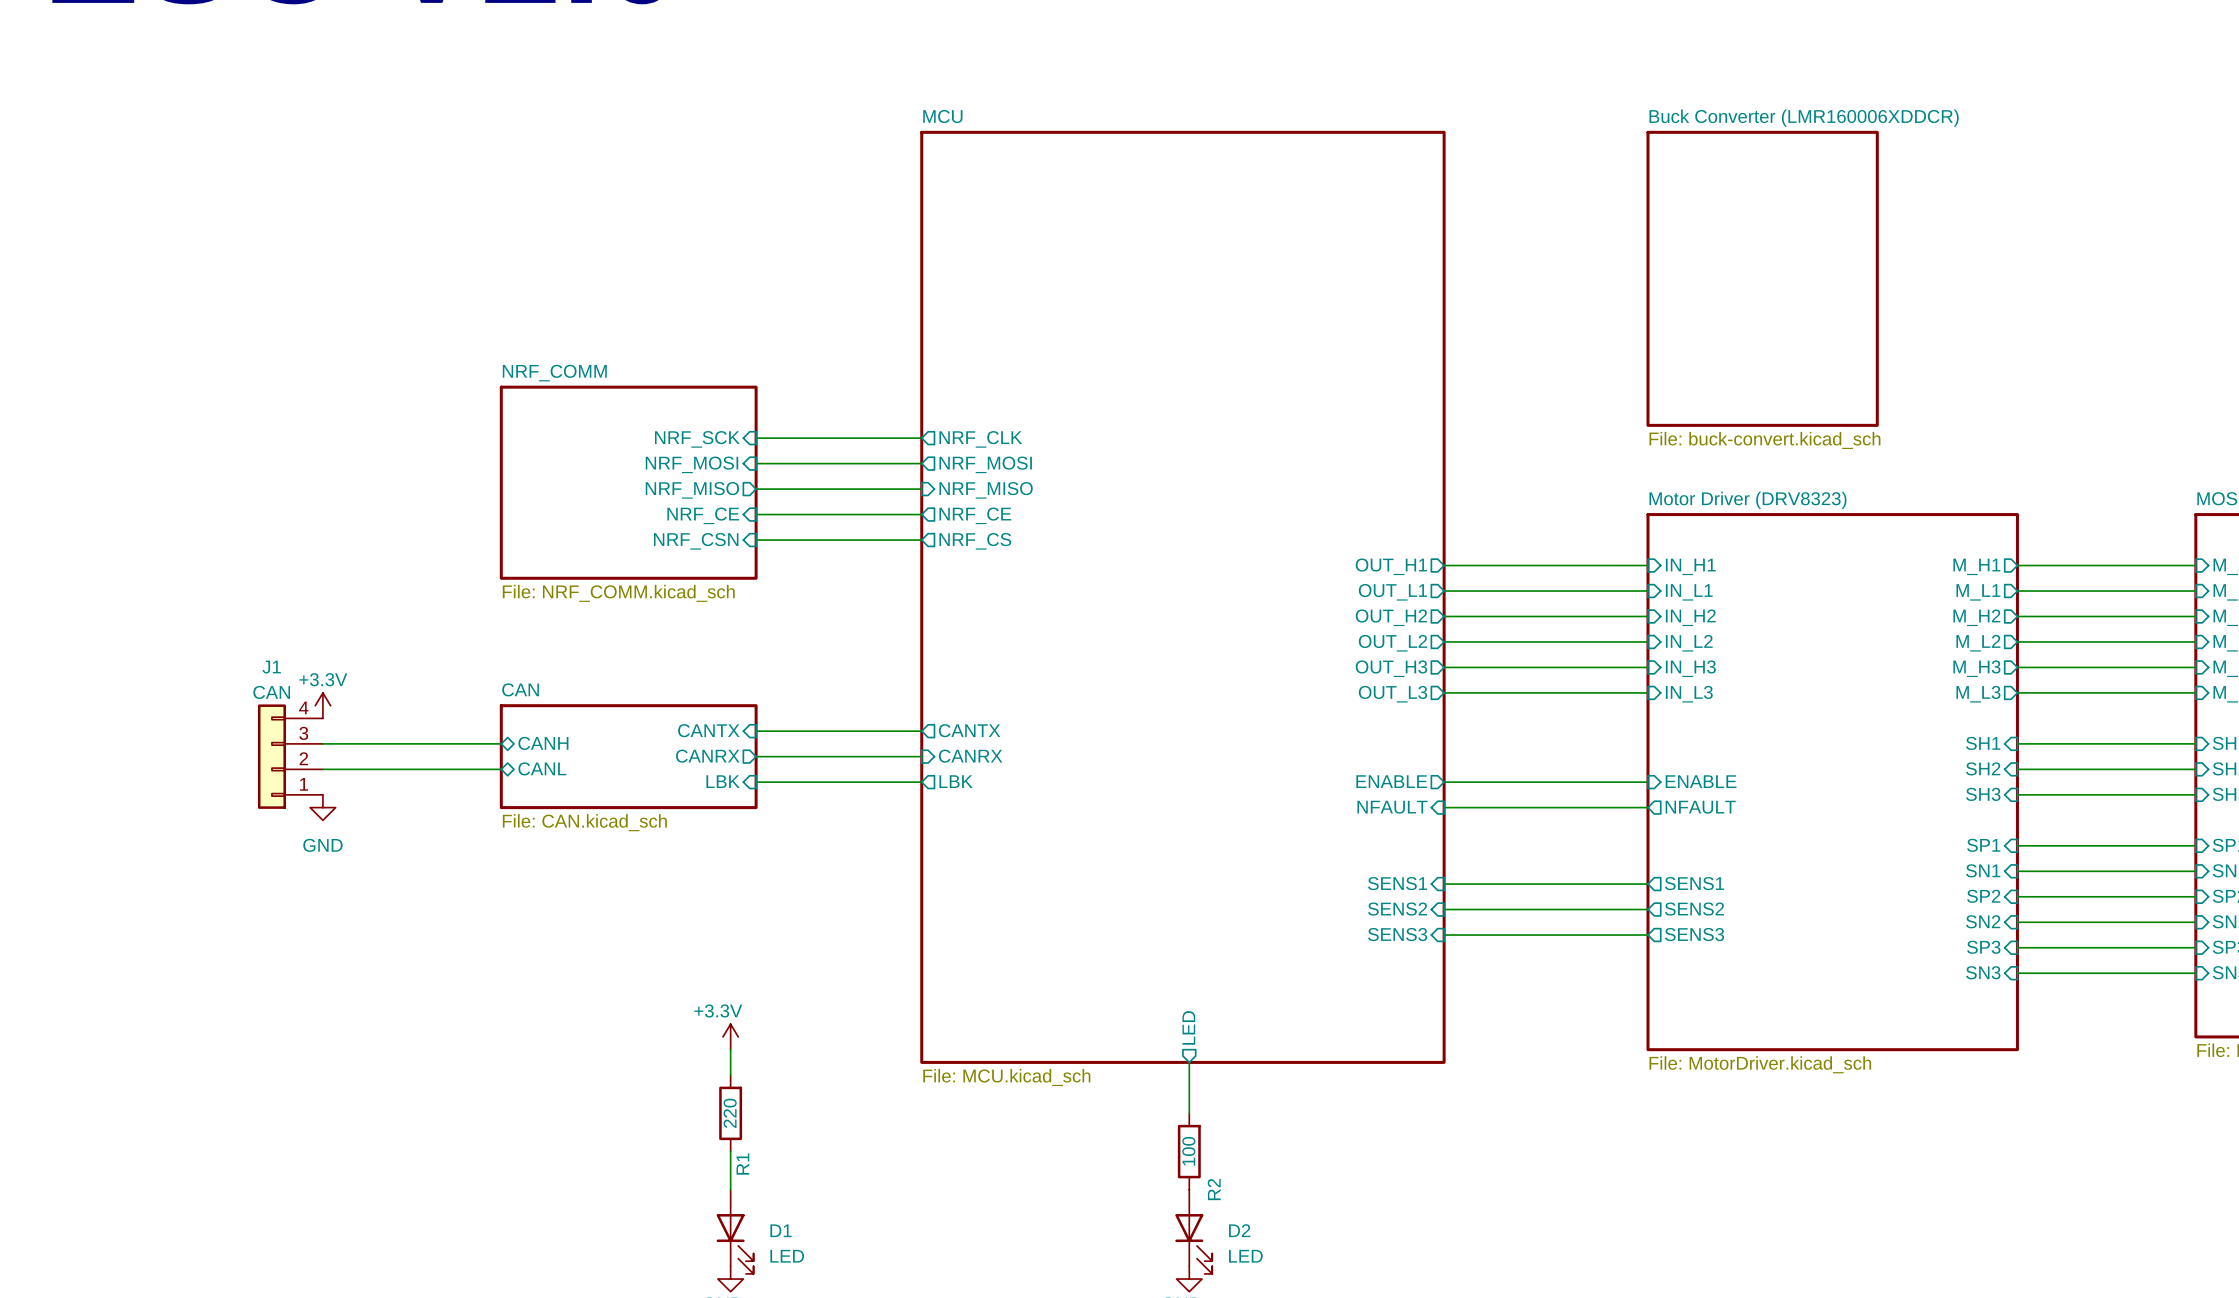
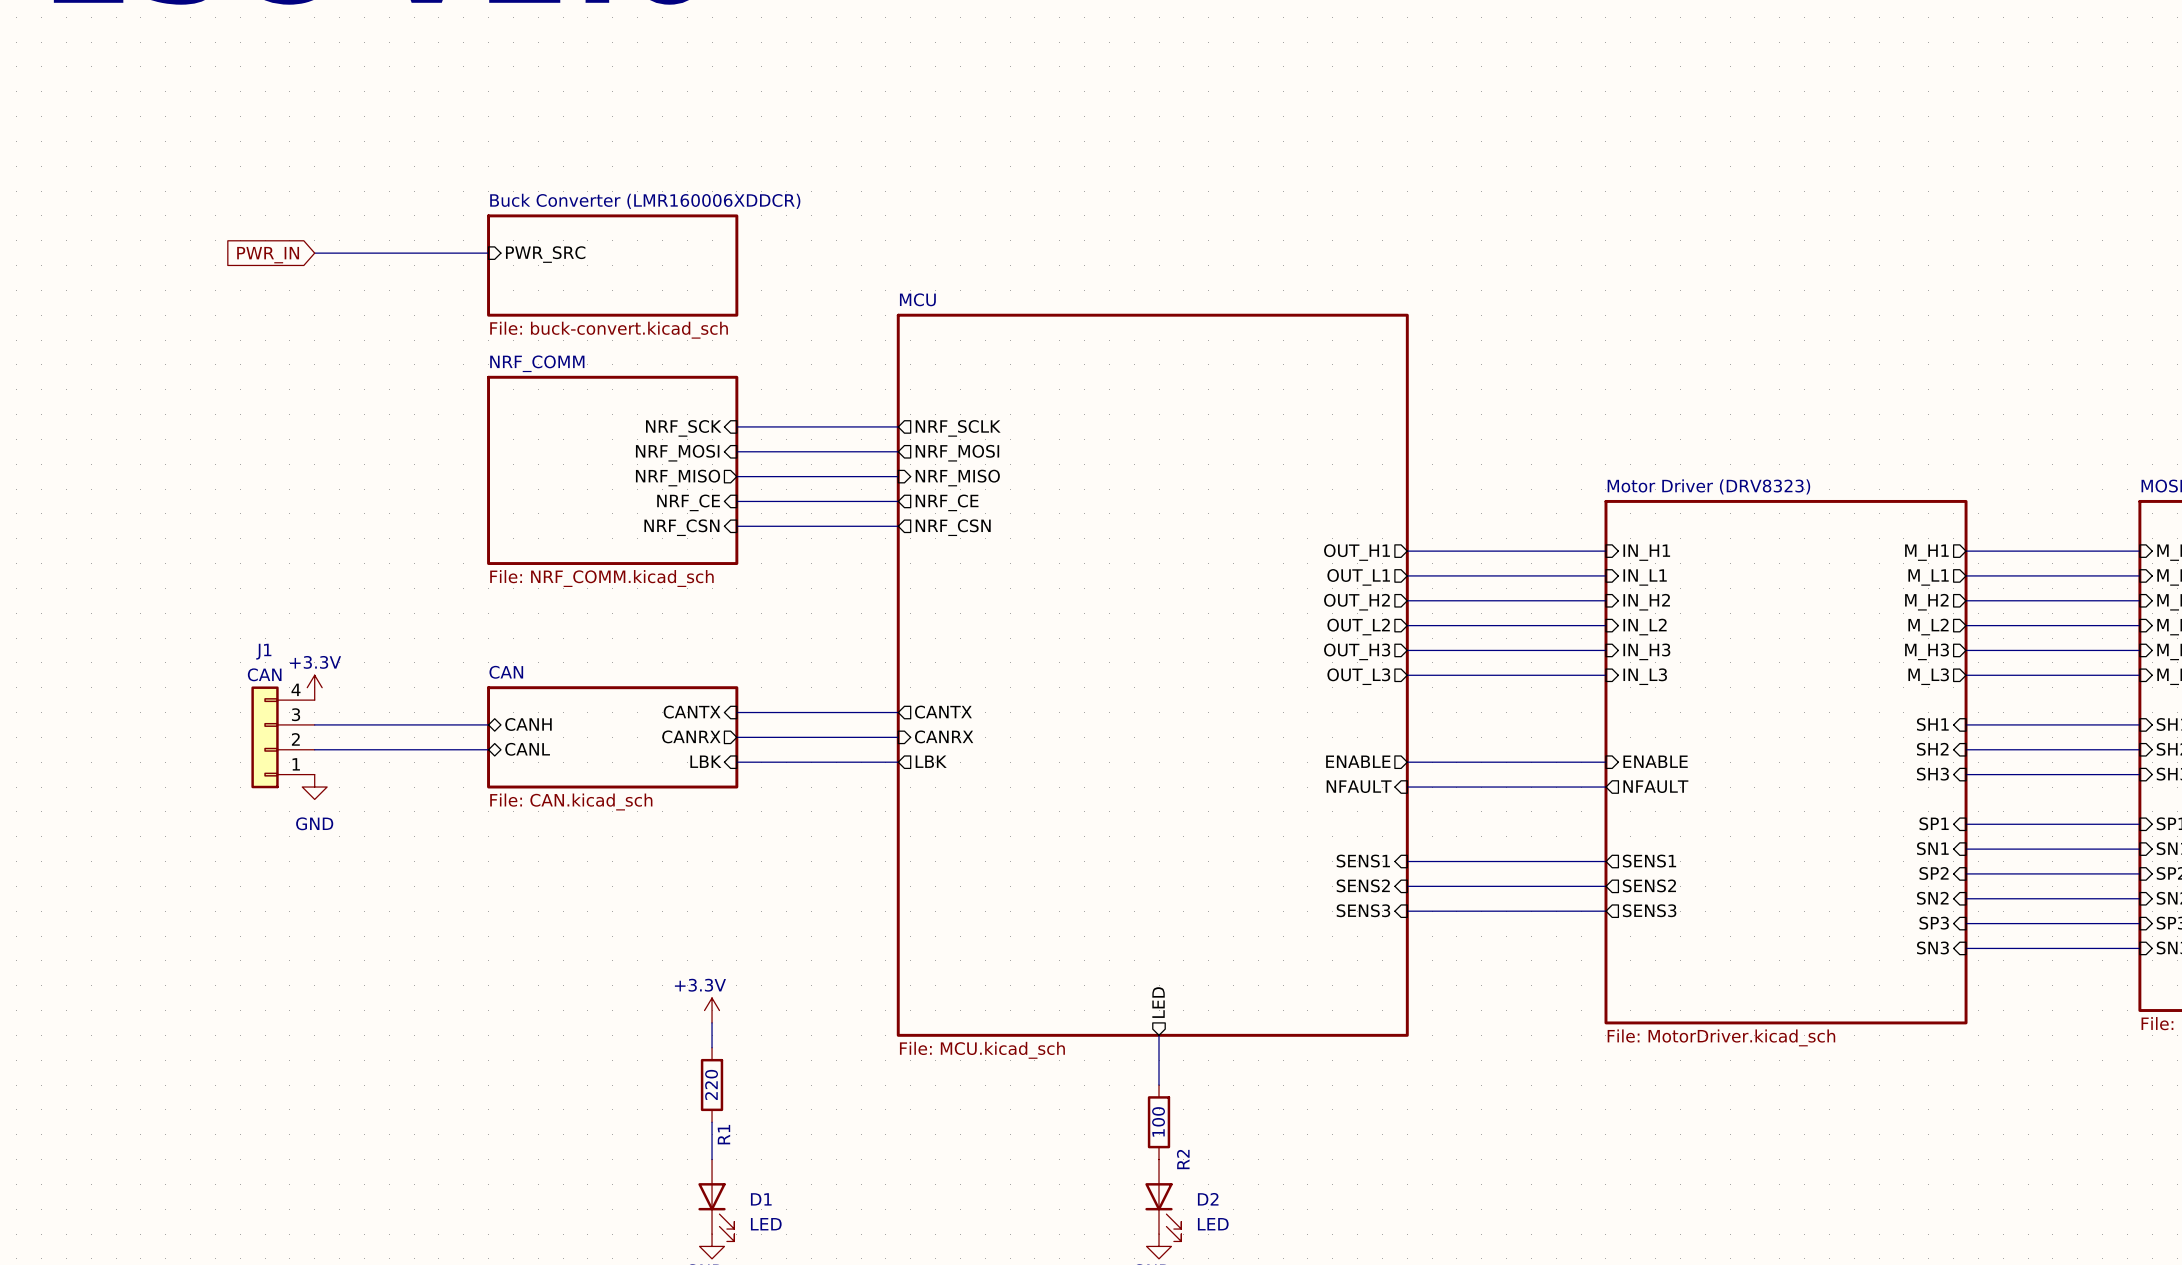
sheet Buck Converter (LMR160006XDDCR) name position: Buck Converter (LMR160006XDDCR) (1804, 118) -> Buck Converter (LMR160006XDDCR) (645, 201)
sheet Buck Converter (LMR160006XDDCR) shape: [1646, 130, 1879, 427] -> [487, 214, 739, 317]
wire: none -> (314, 253) (488, 253)
global label: none -> PWR_IN (268, 255)
sheet pin: none -> PWR_SRC (545, 254)
sheet pin: NRF_CLK (980, 439) -> NRF_SCLK (958, 428)
sheet Buck Converter (LMR160006XDDCR) value position: File: buck-convert.kicad_sch (1764, 440) -> File: buck-convert.kicad_sch (609, 330)
sheet pin: NRF_CS (975, 541) -> NRF_CSN (953, 527)
sheet MCU: File: MCU.kicad_sch (1182, 597) -> none
sheet MCU: none -> File: MCU.kicad_sch (1152, 675)

